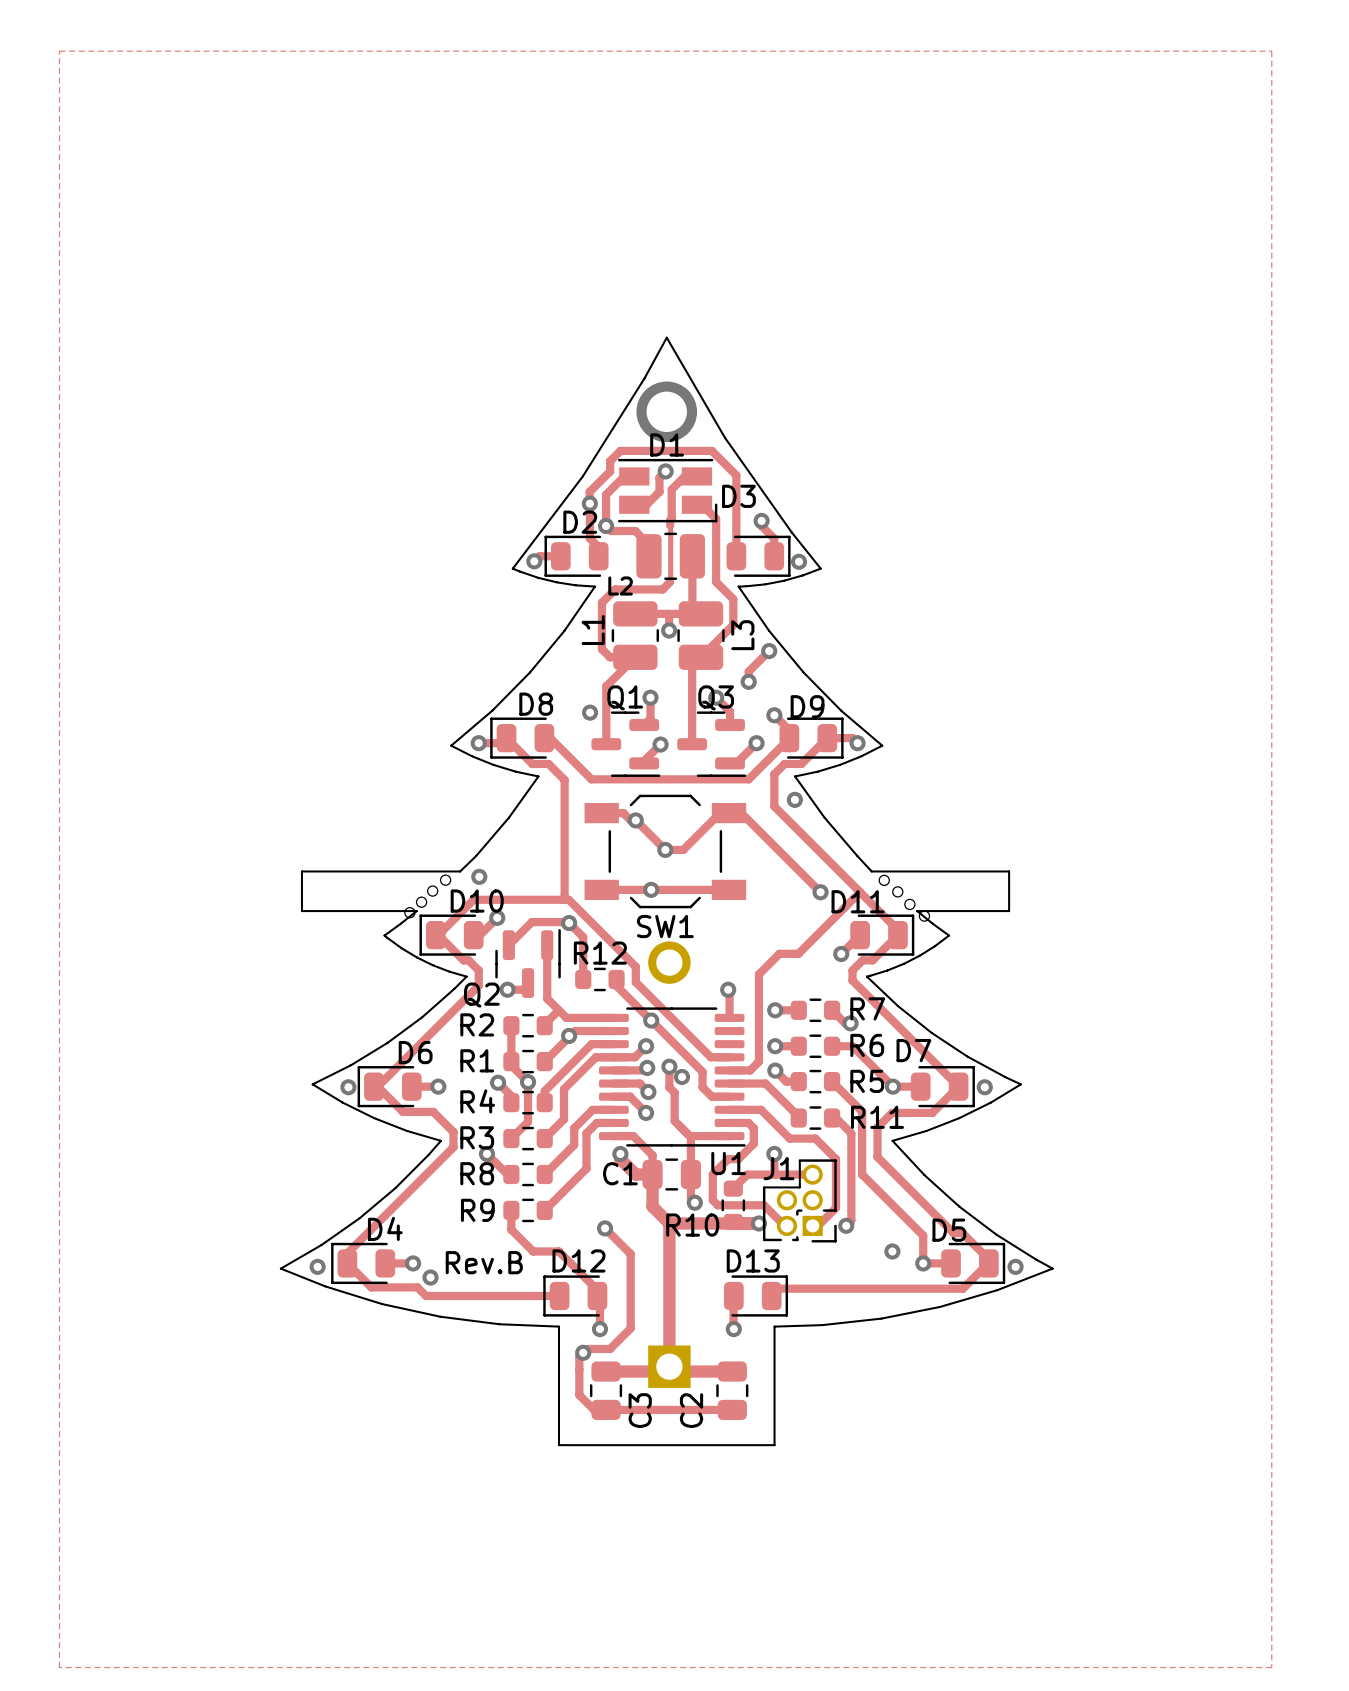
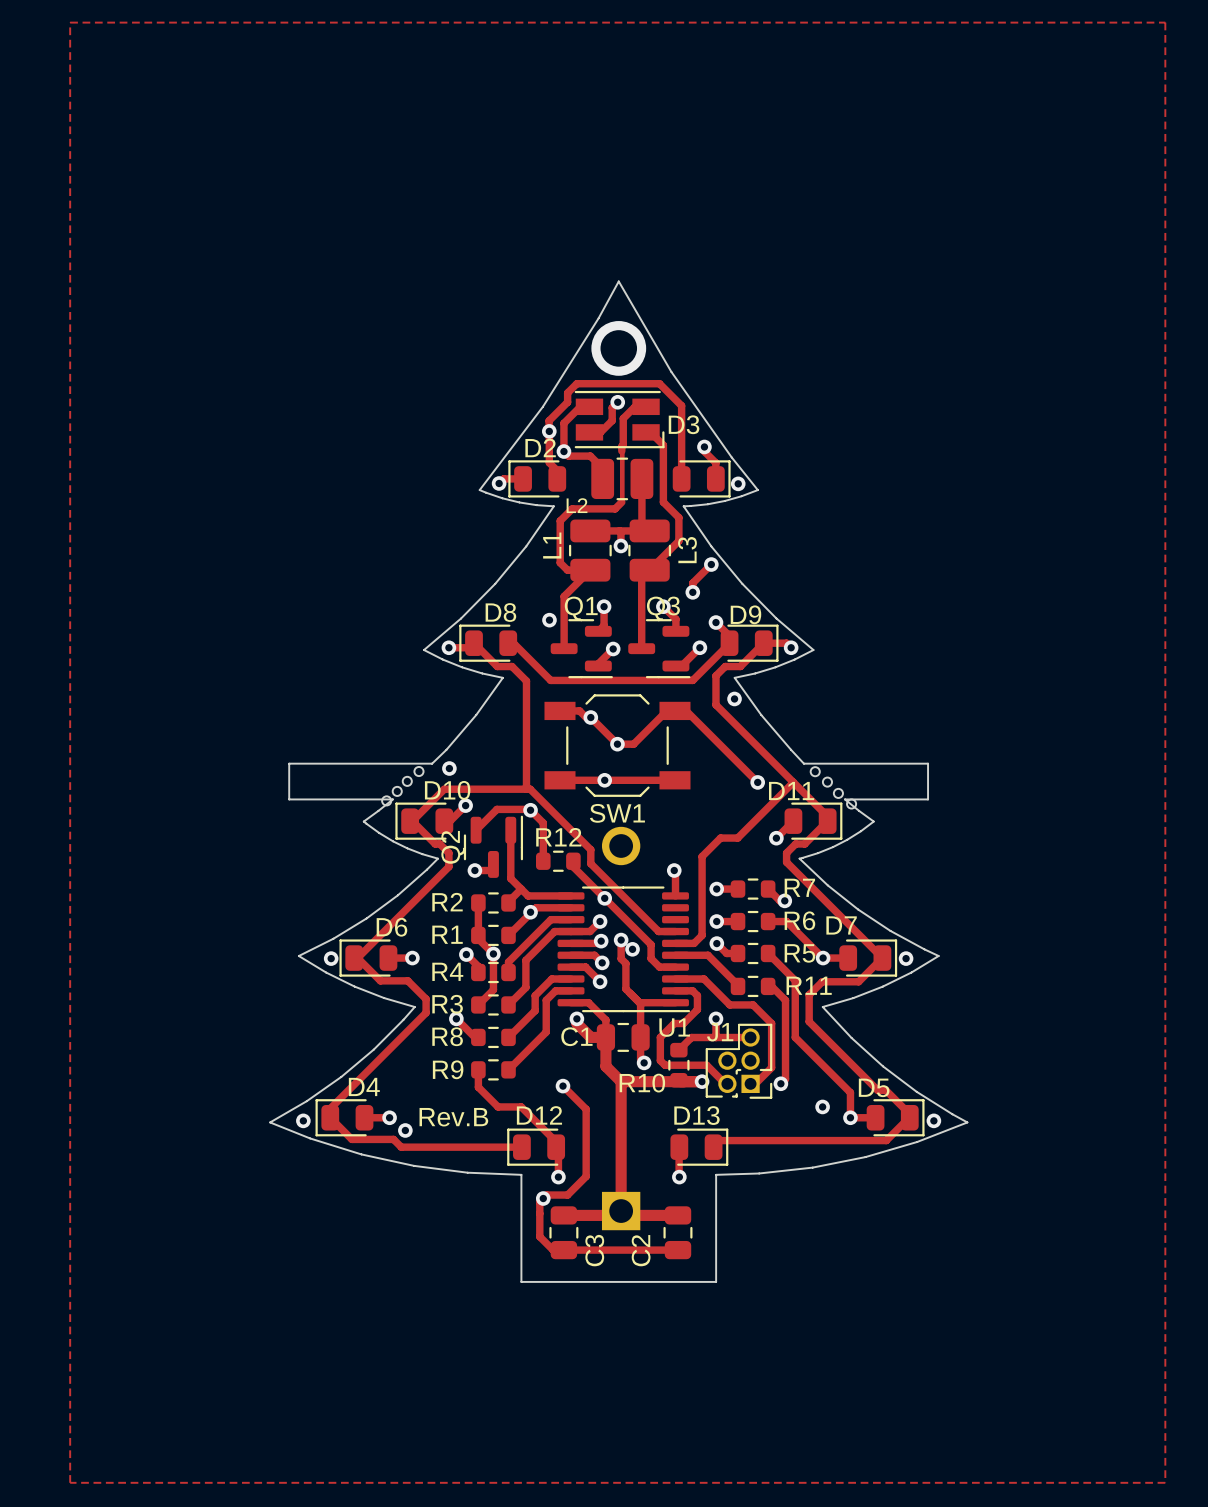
D1 name: D1 (667, 445) -> none
Q2 name rotation: 0° (481, 995) -> 90° counterclockwise (453, 847)

